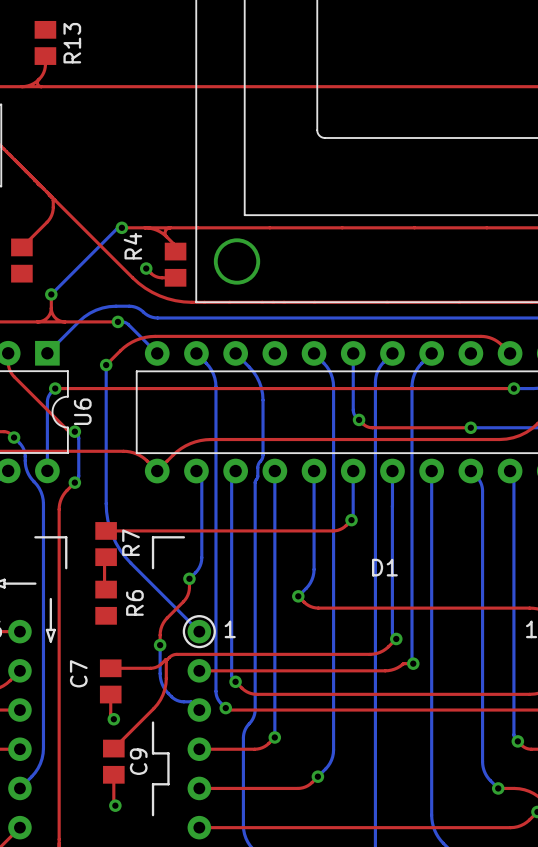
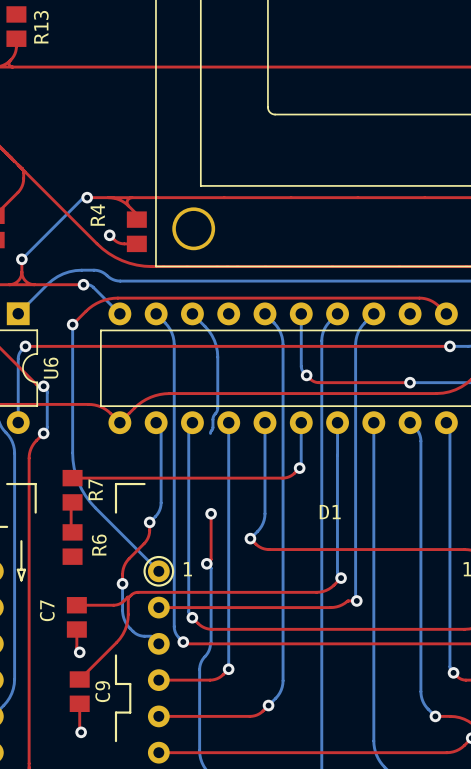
bottom track: (255, 482) (255, 709) -> (206, 563) (211, 568) (210, 643)
top track: none -> (211, 513) (211, 559) (206, 563)
via: none -> (211, 513)
via: none -> (206, 563)

